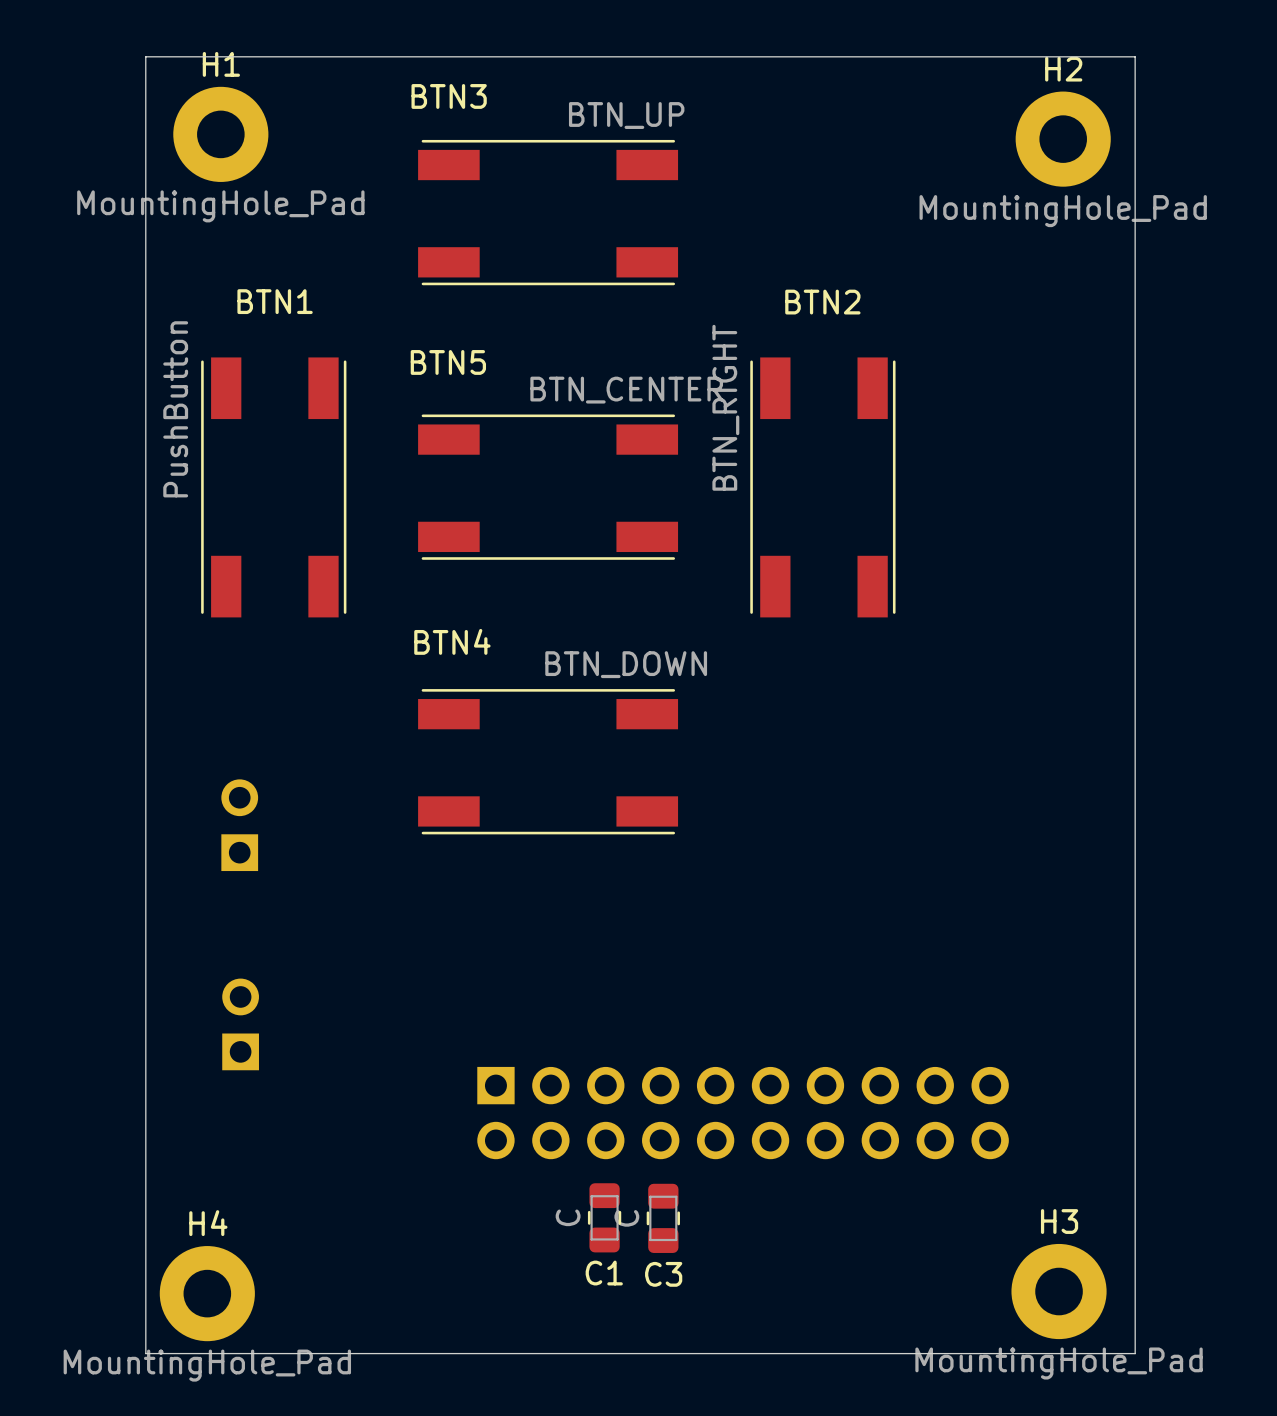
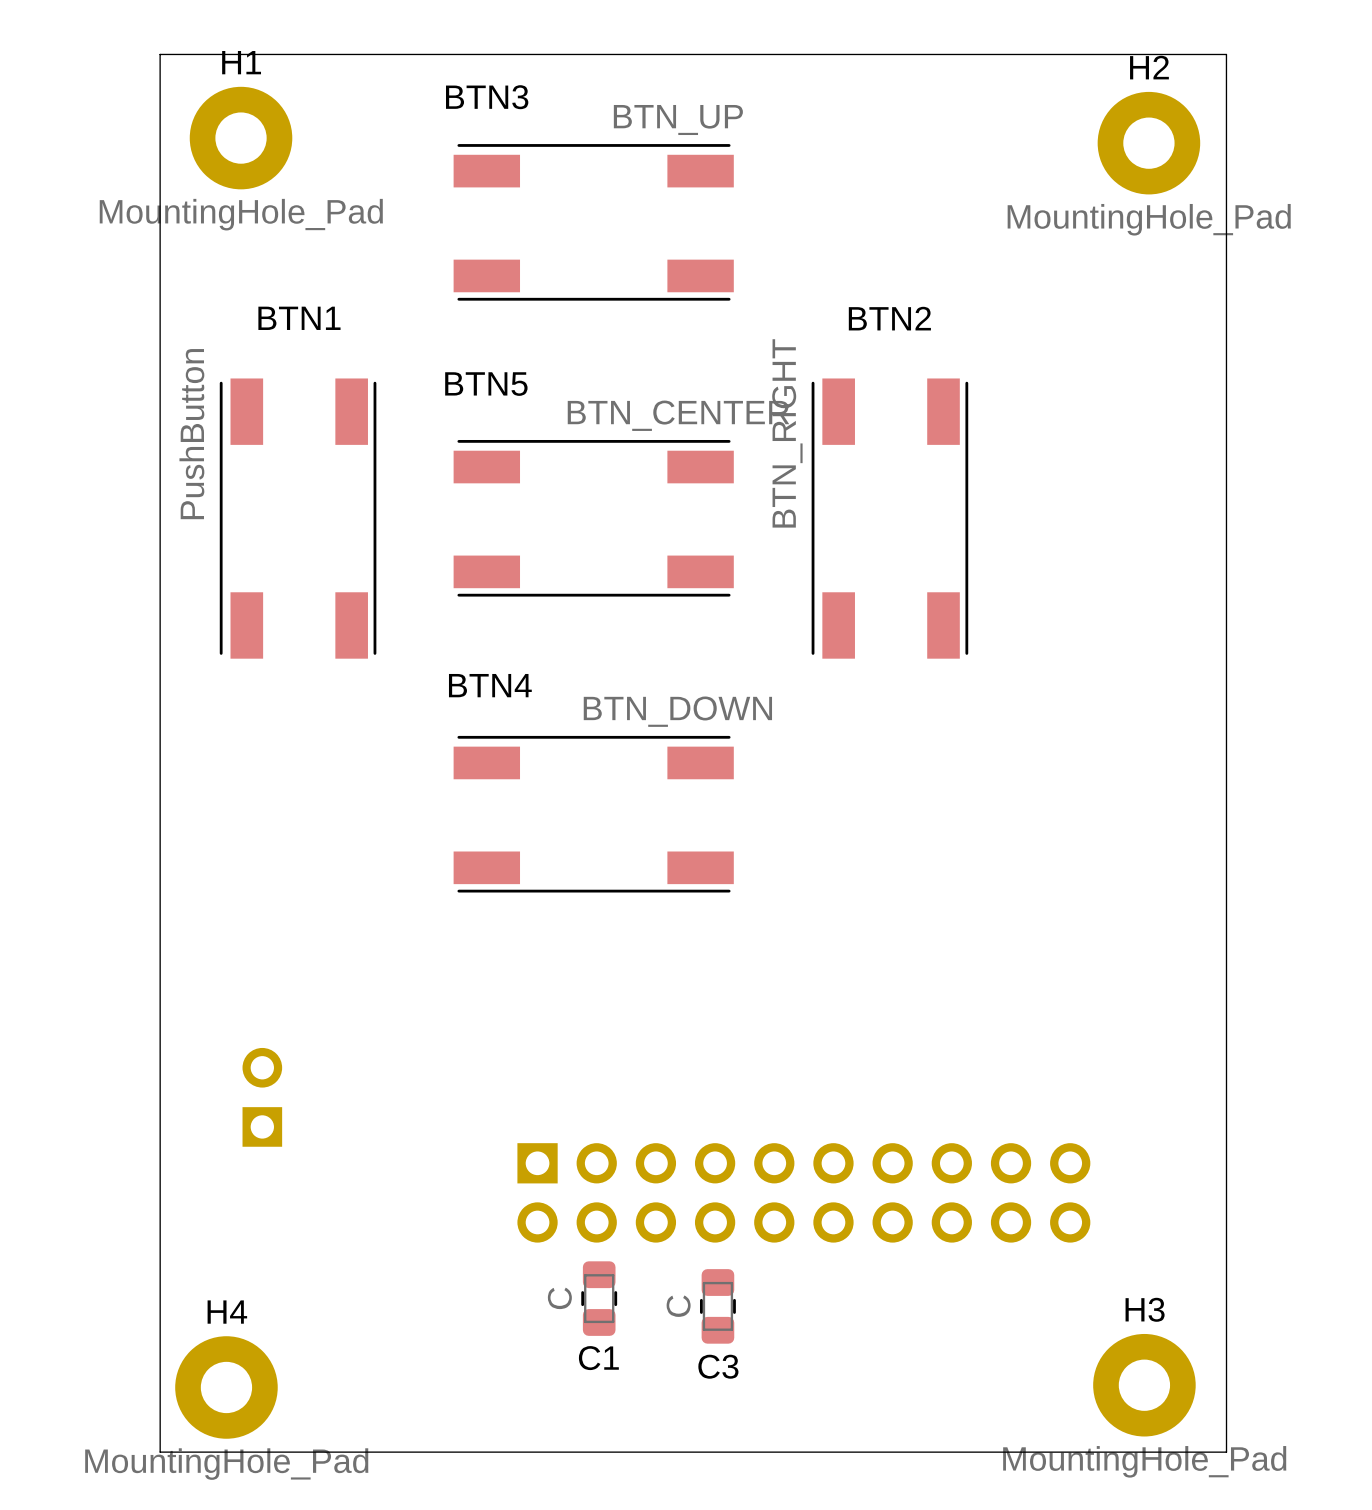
part: (239, 825) -> none
C1 position: (604, 1217) -> (599, 1298)

